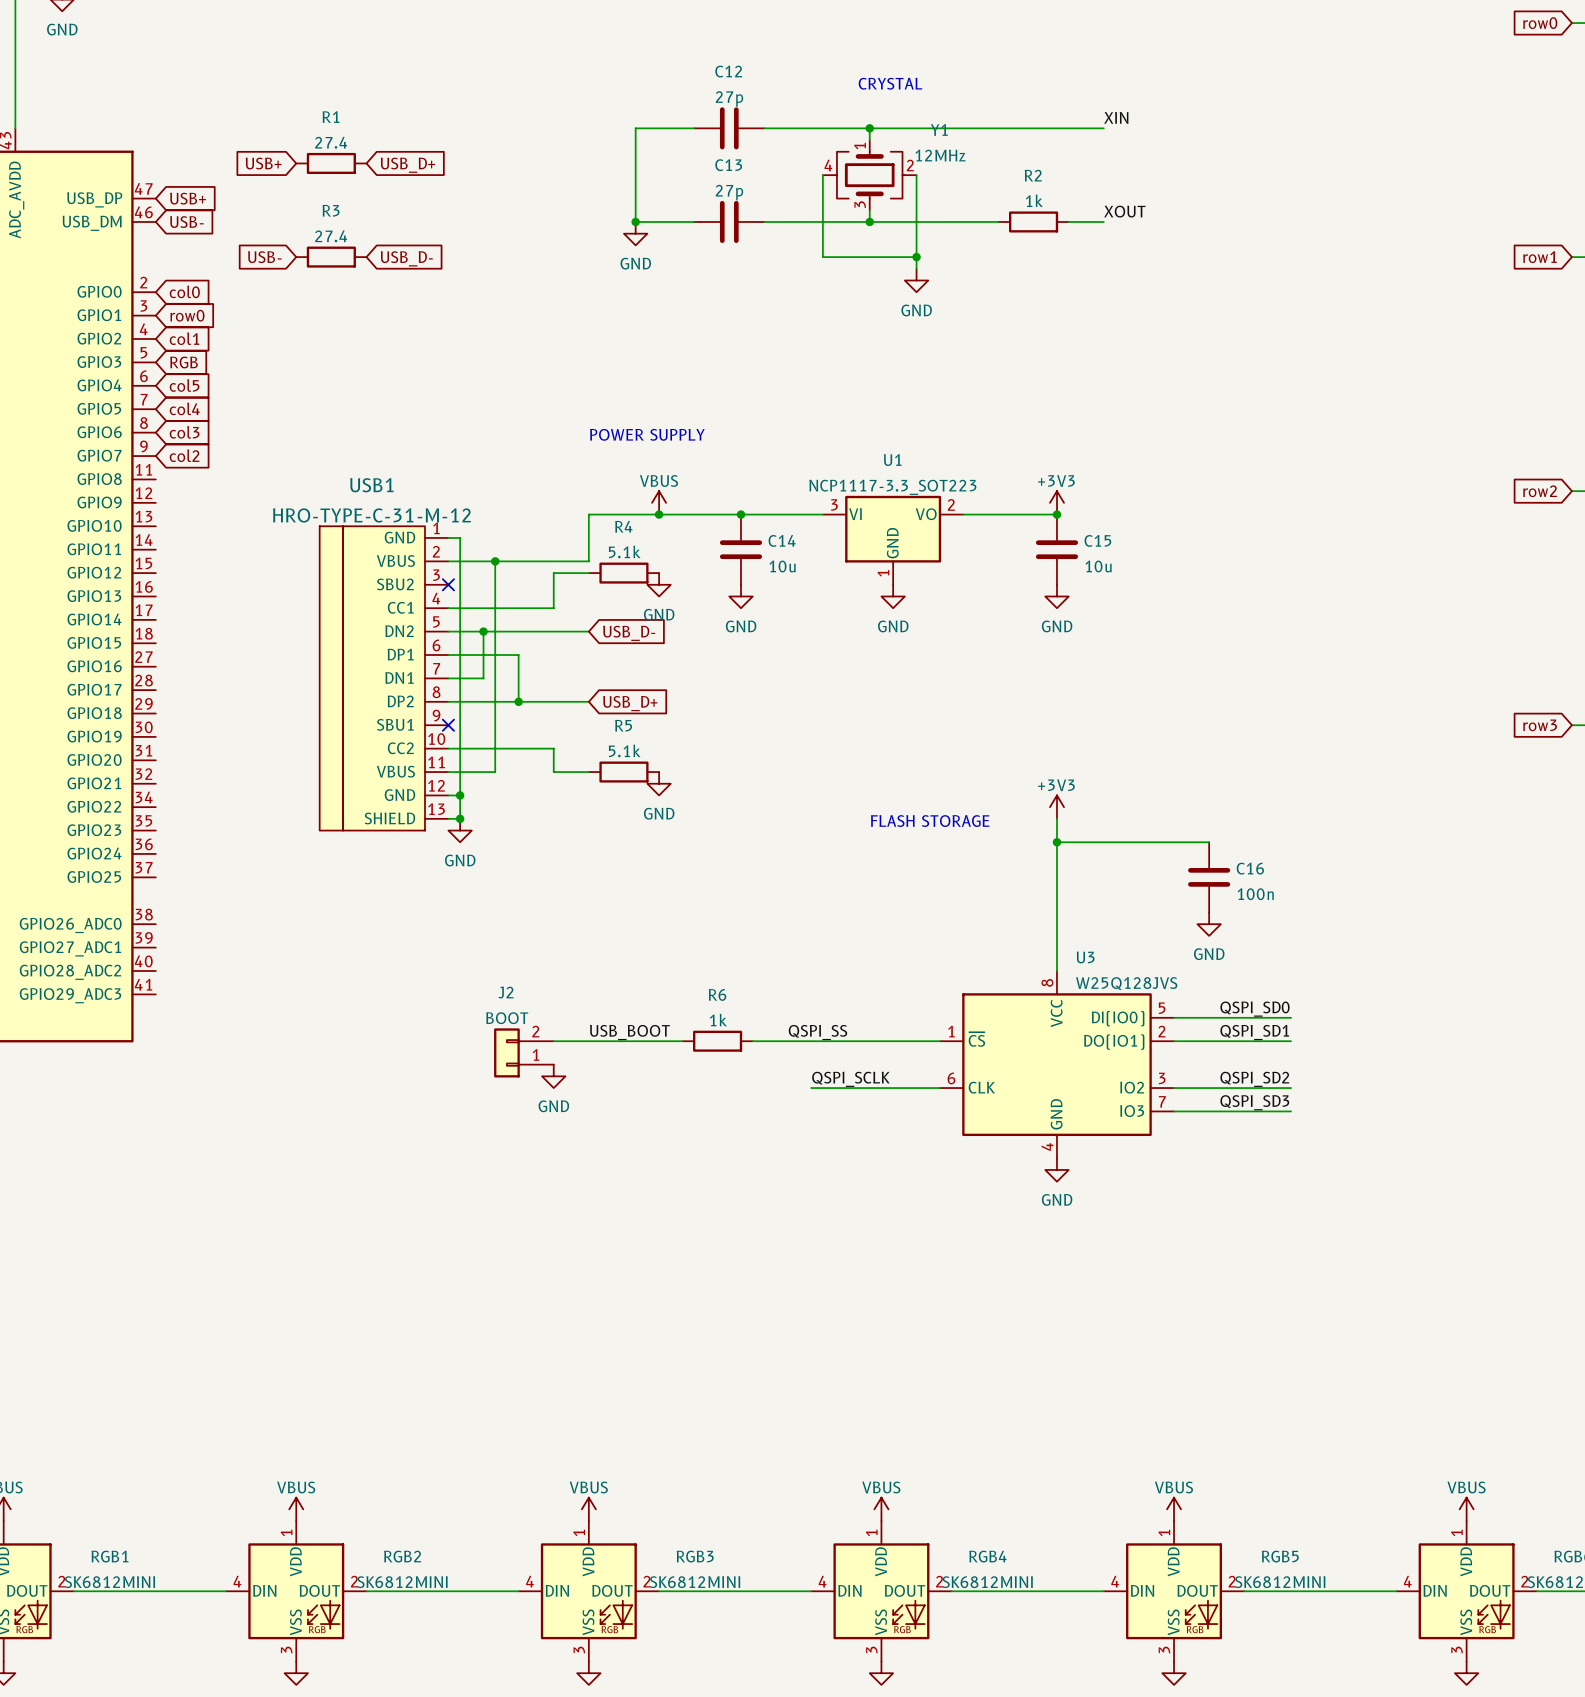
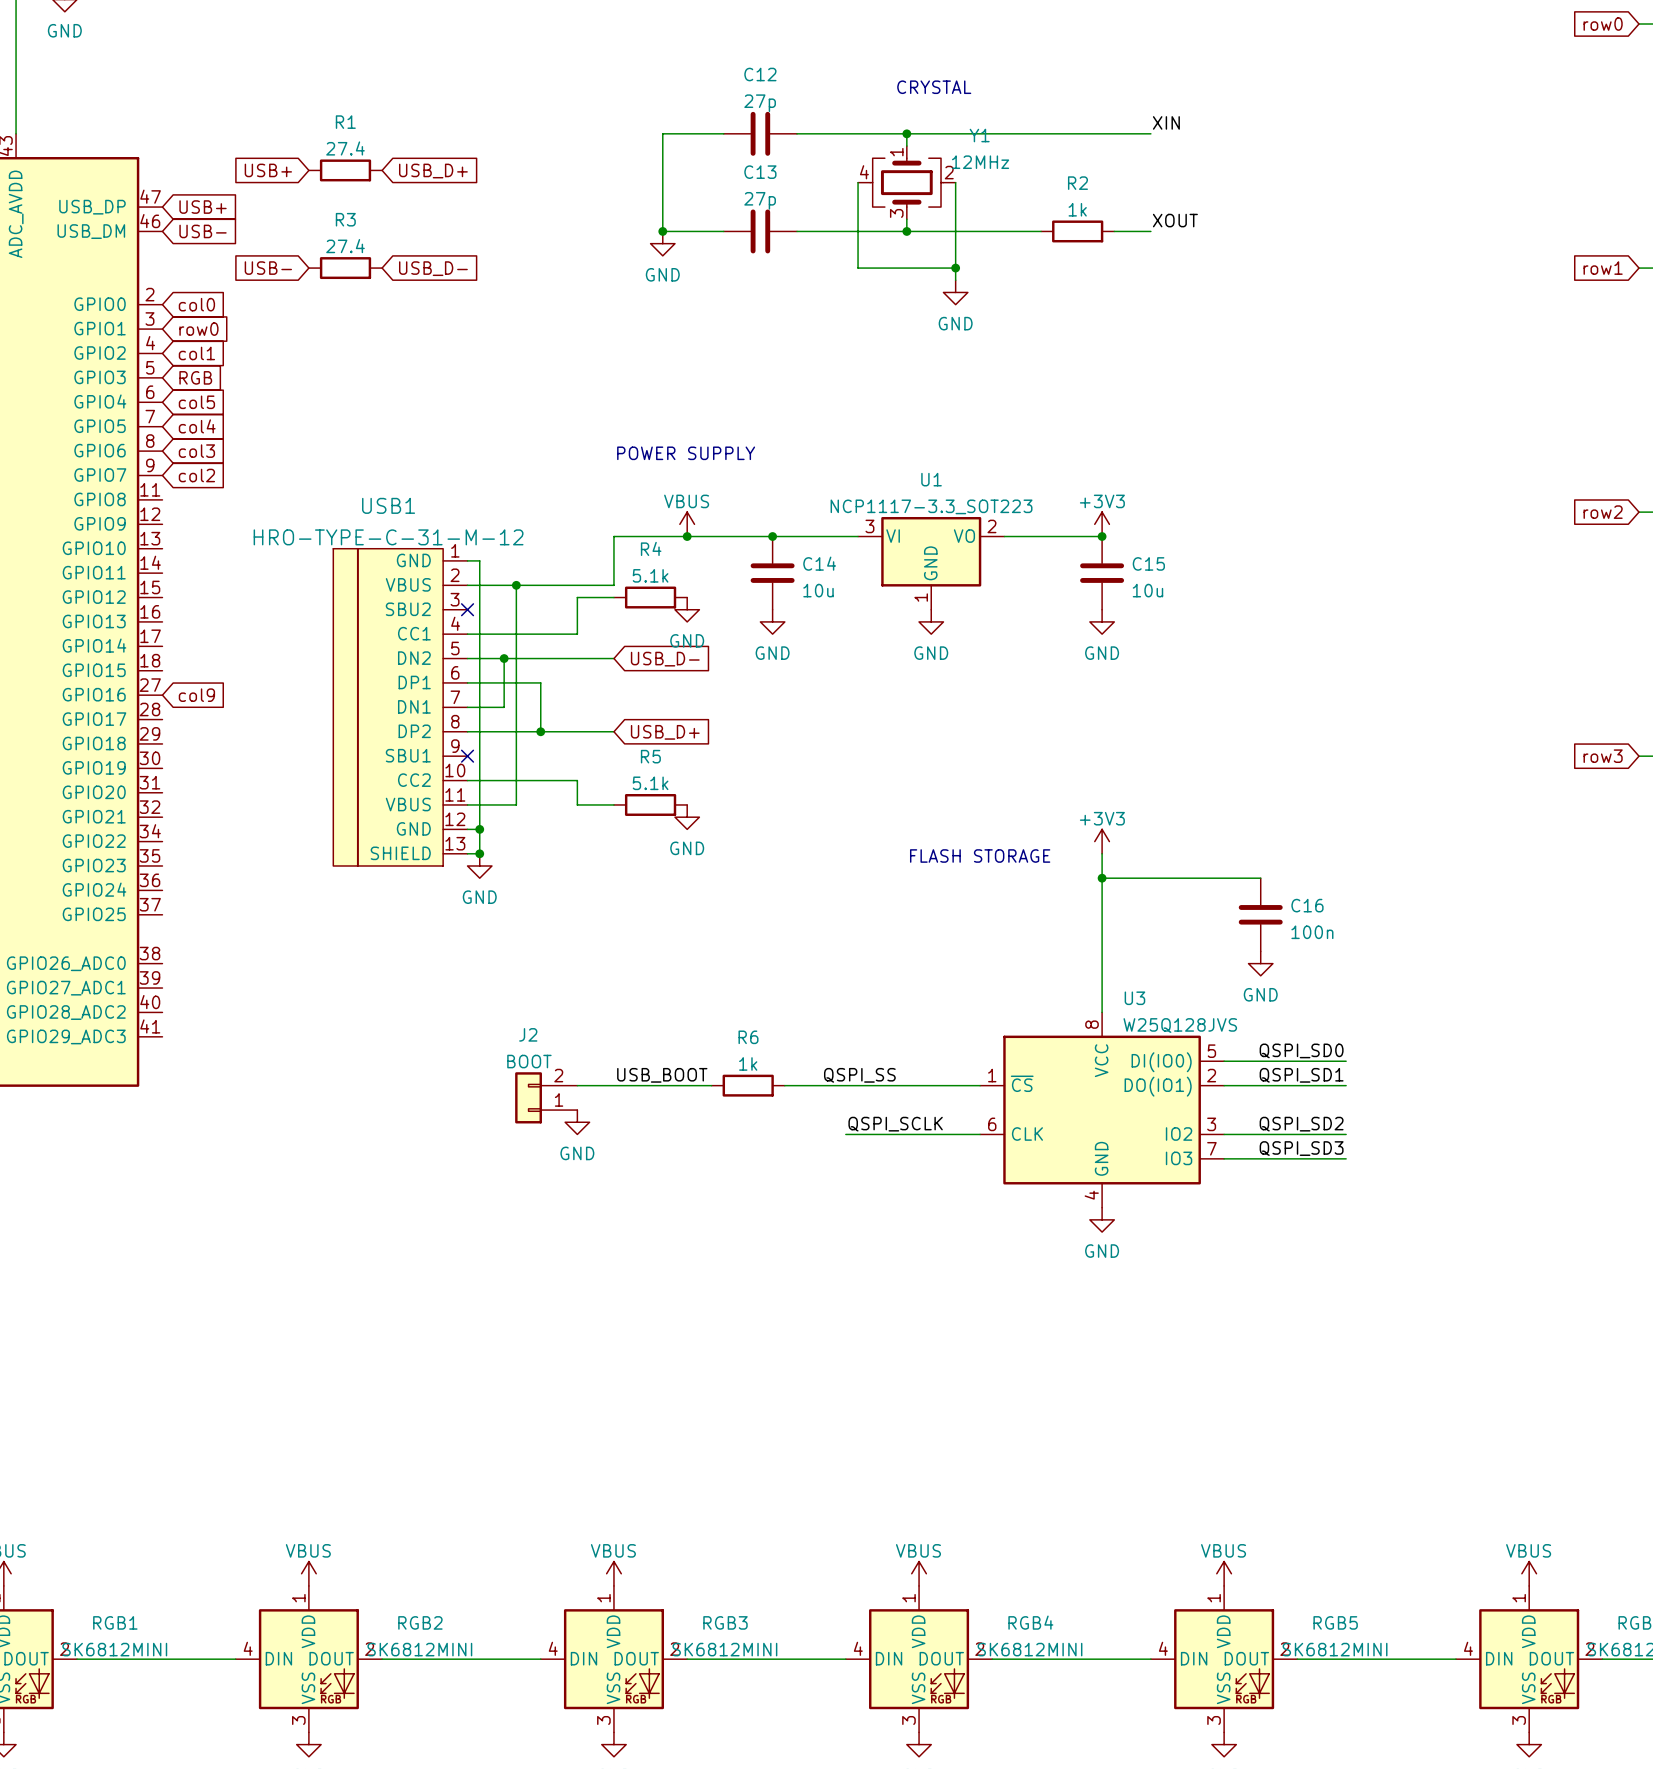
global label: none -> col9 (196, 695)

